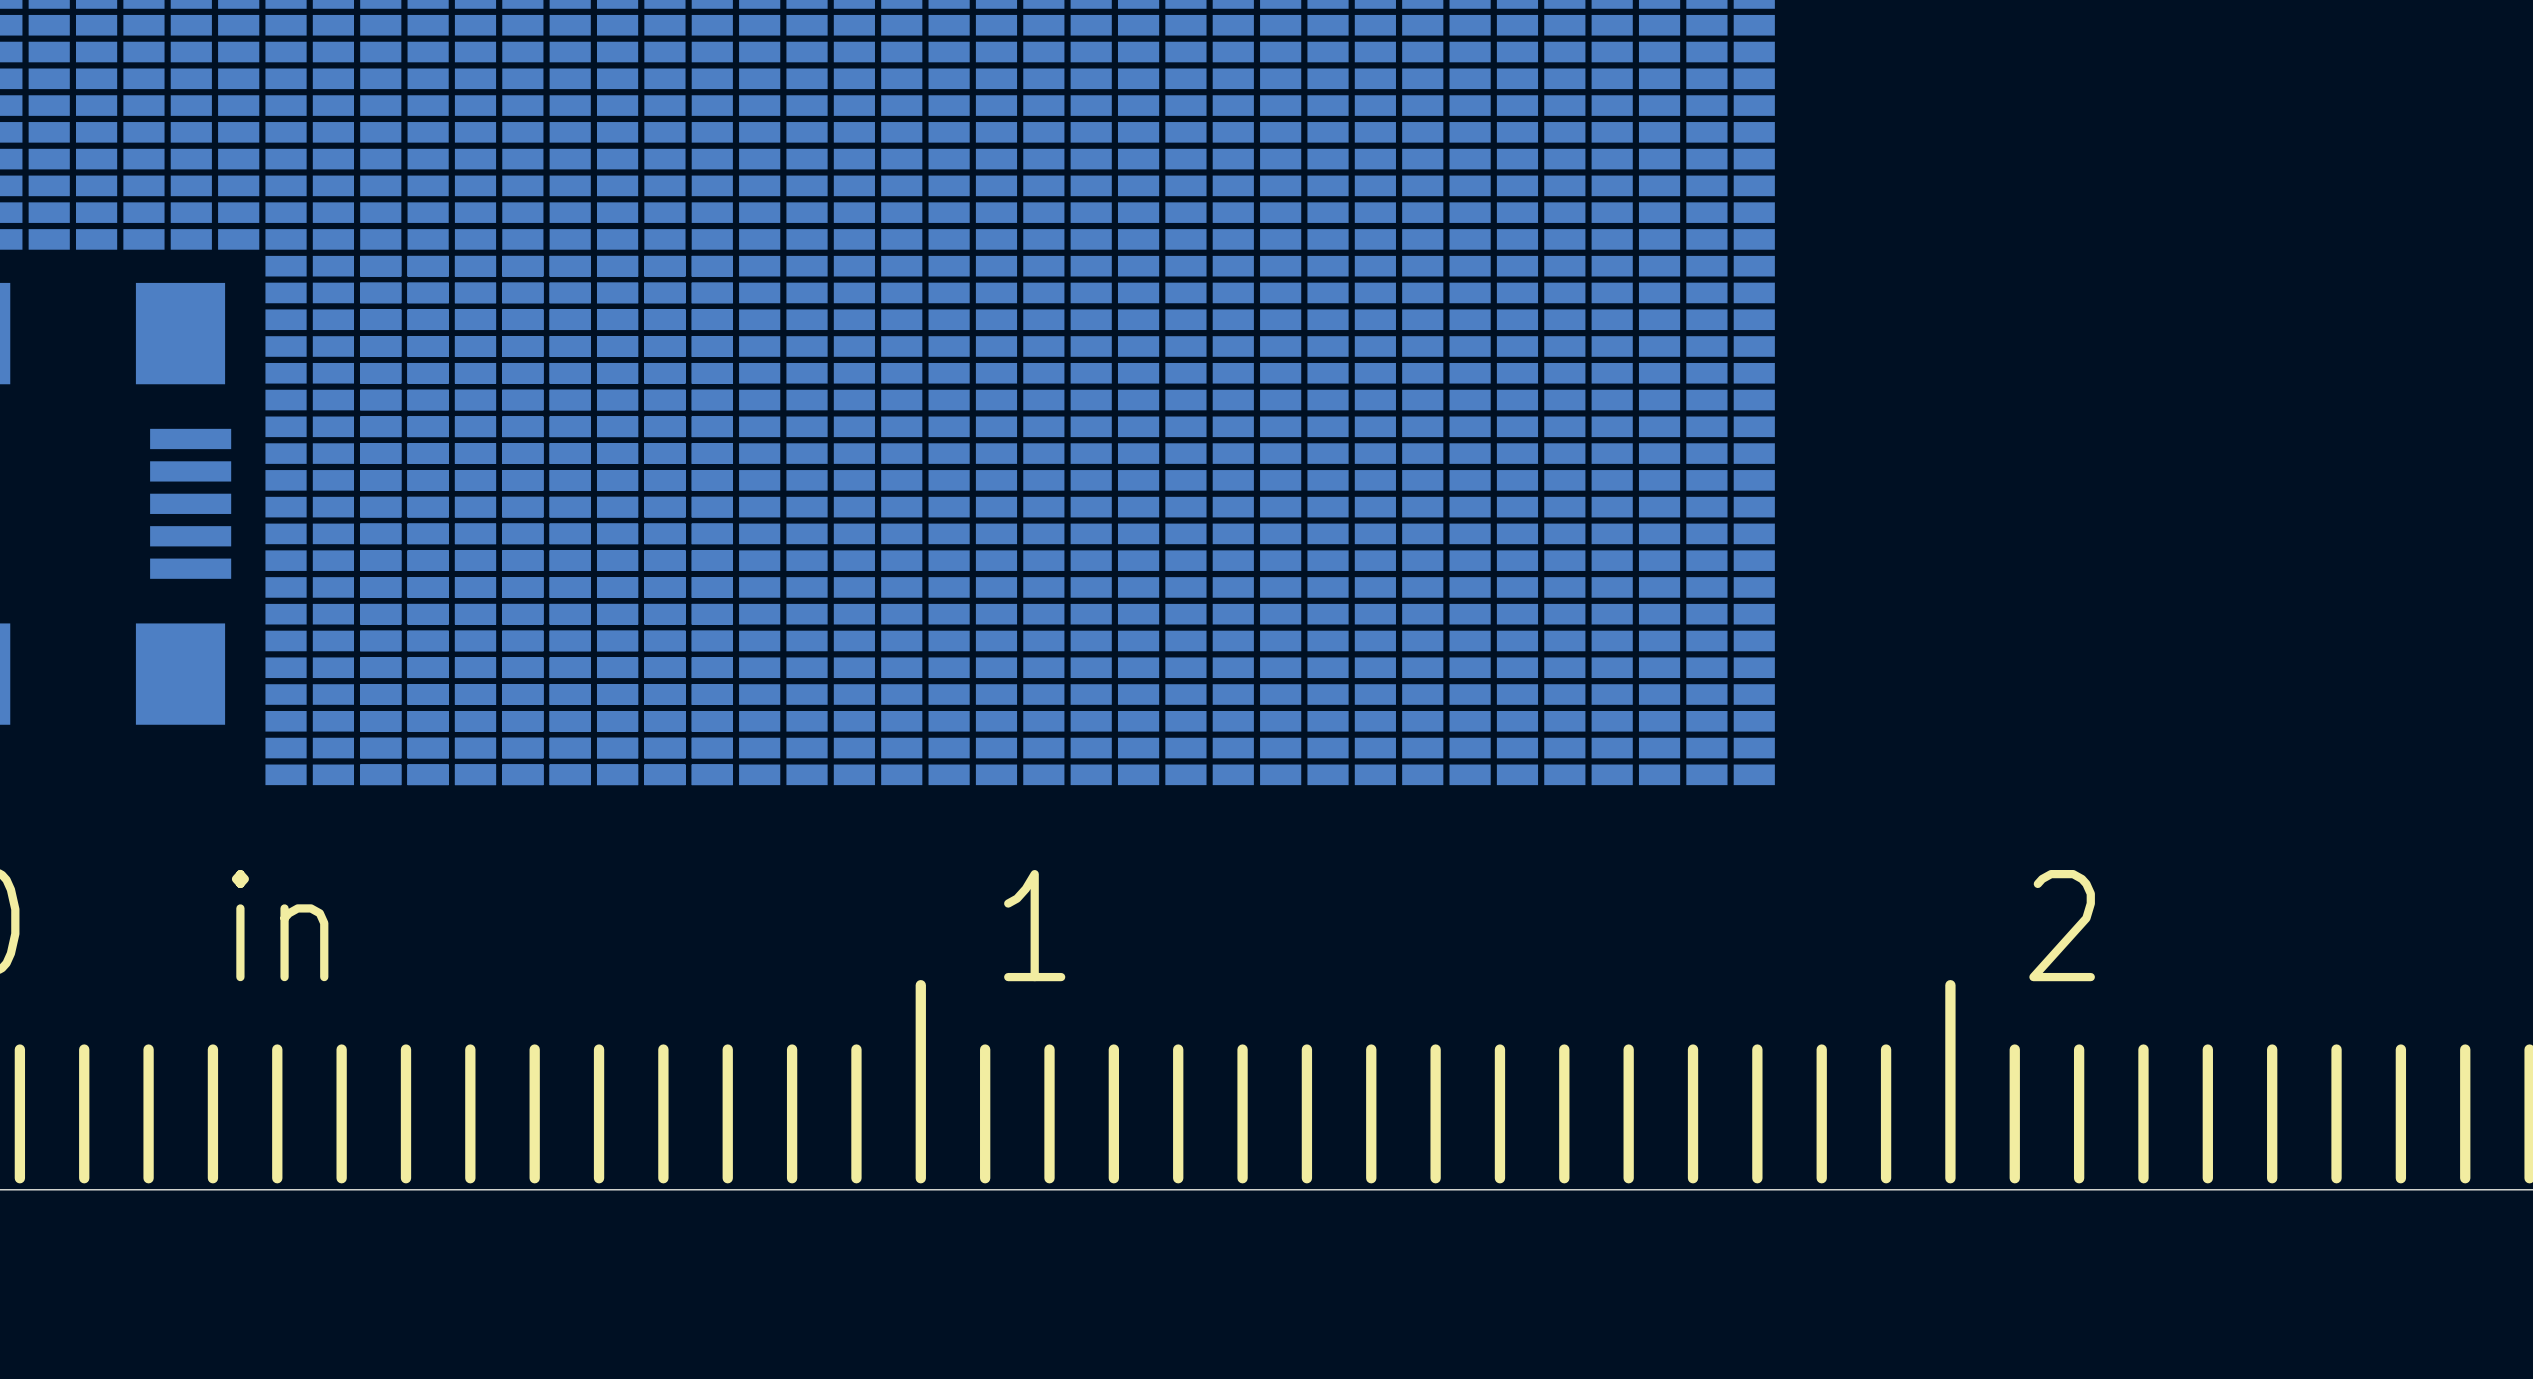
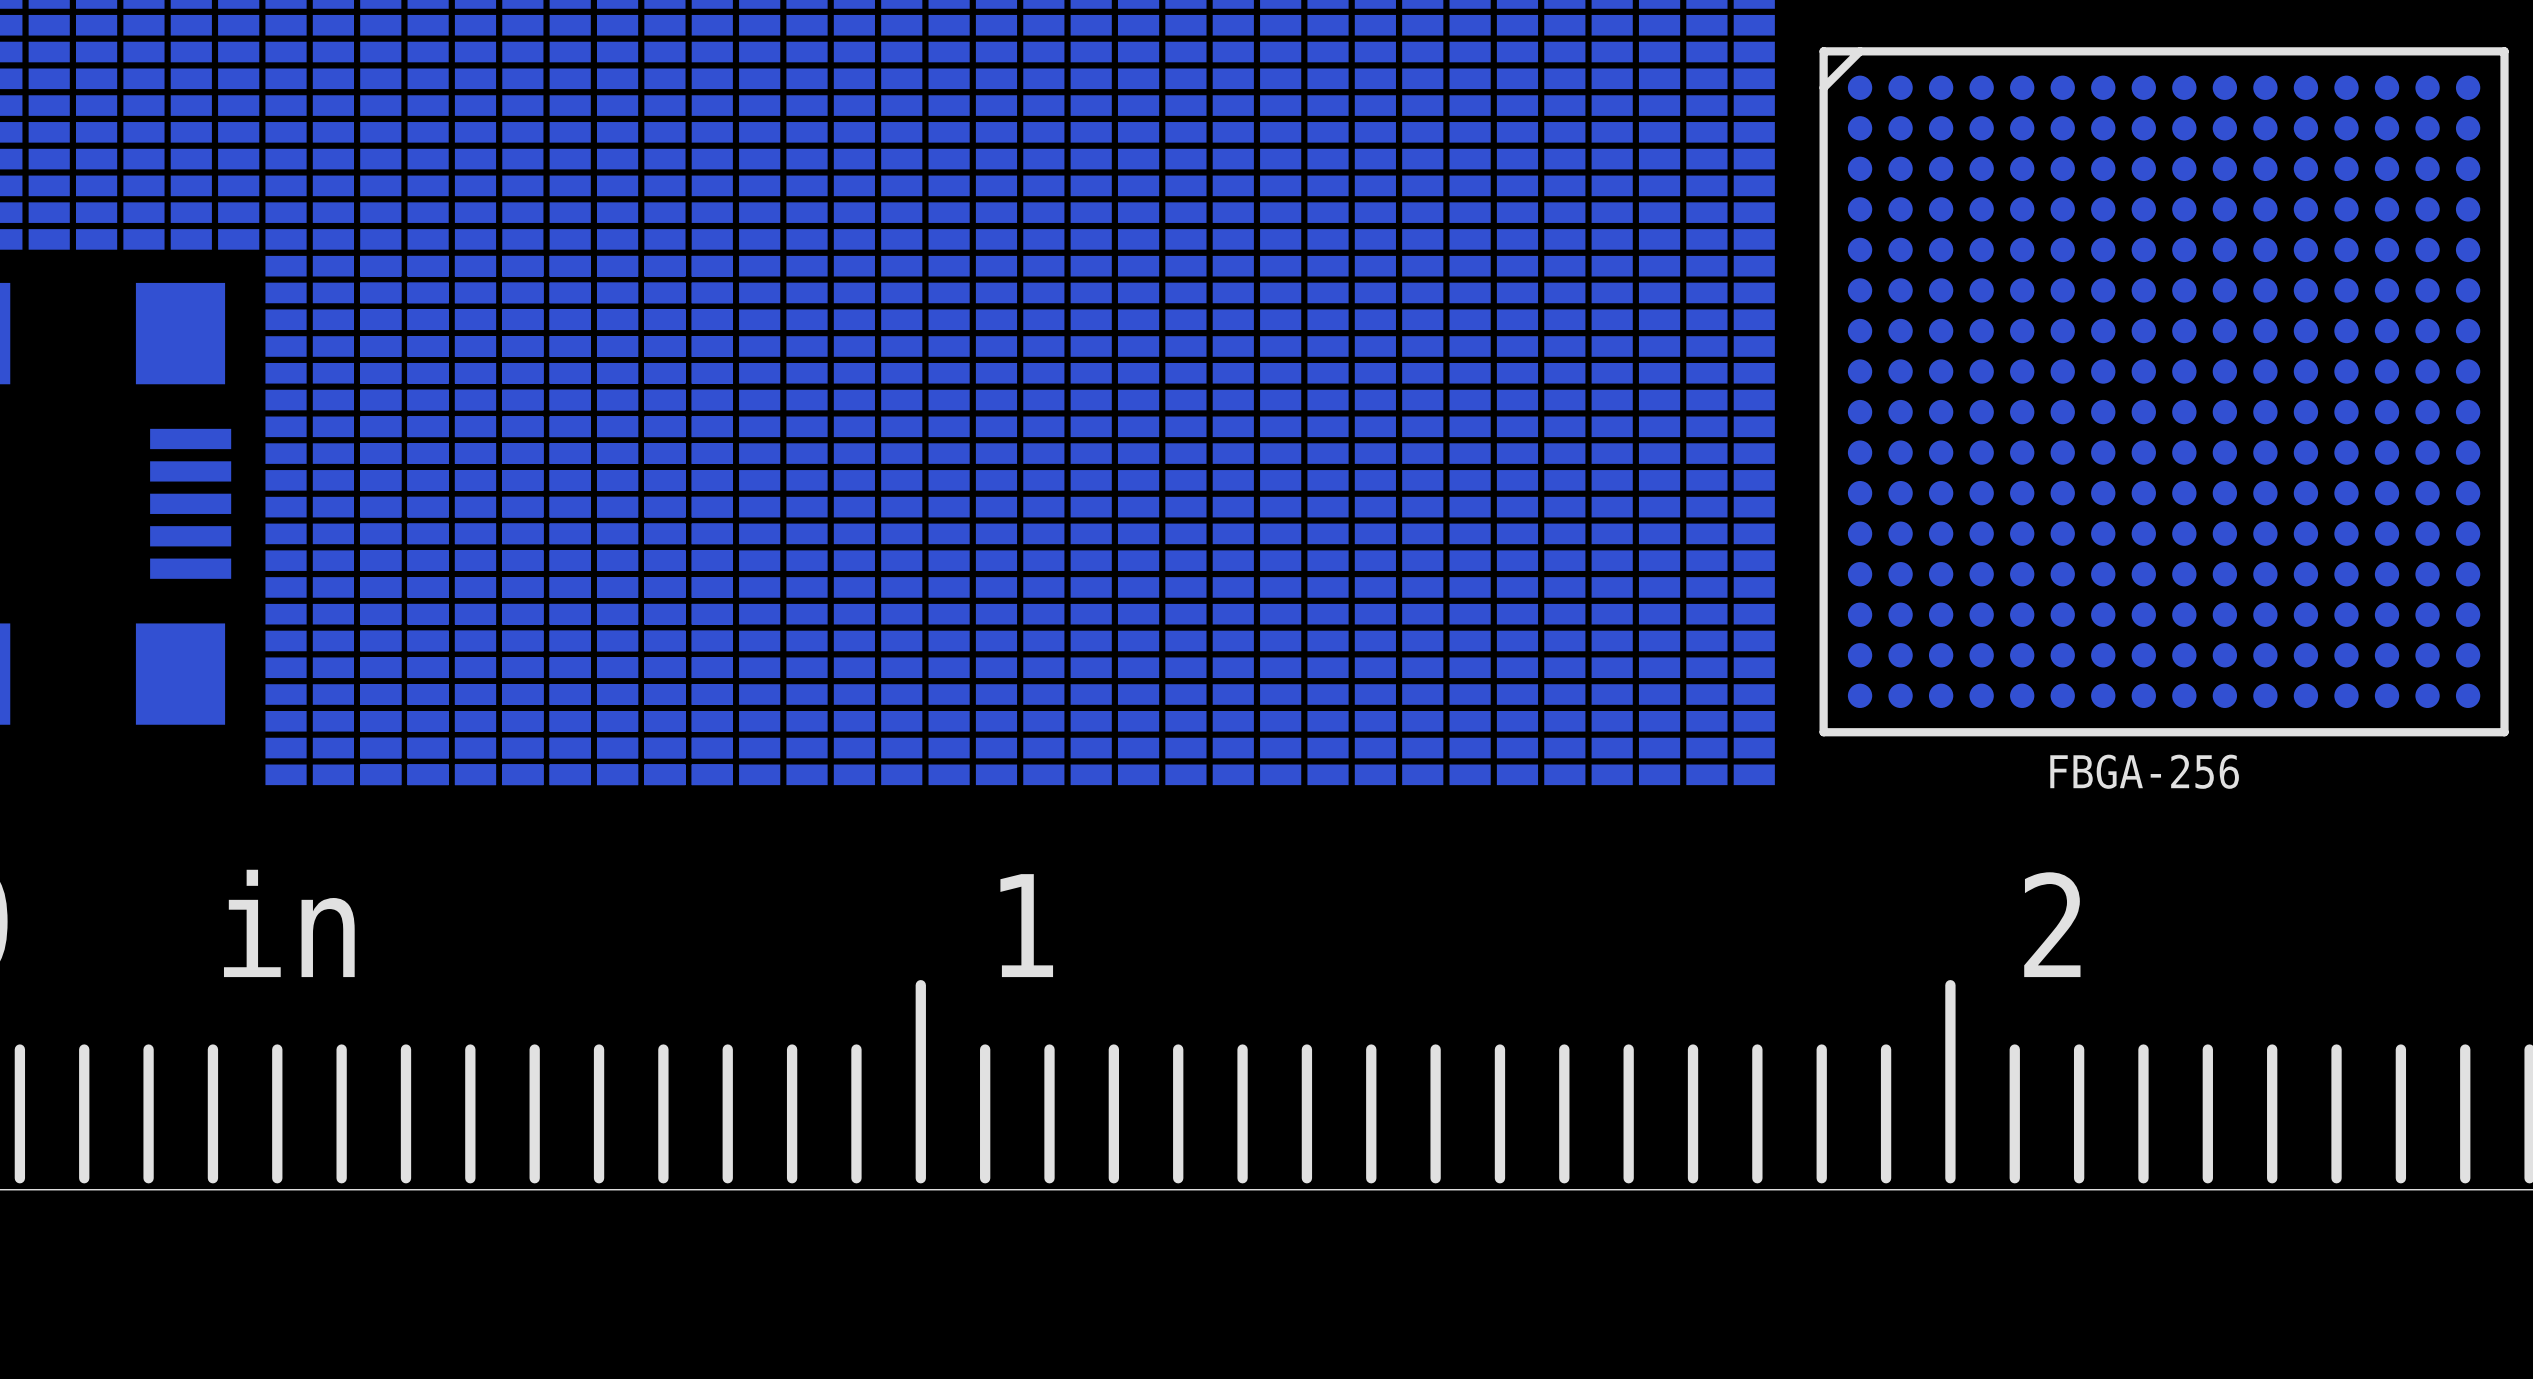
part: none -> (2164, 391)
text: none -> FBGA-256 (2144, 771)

